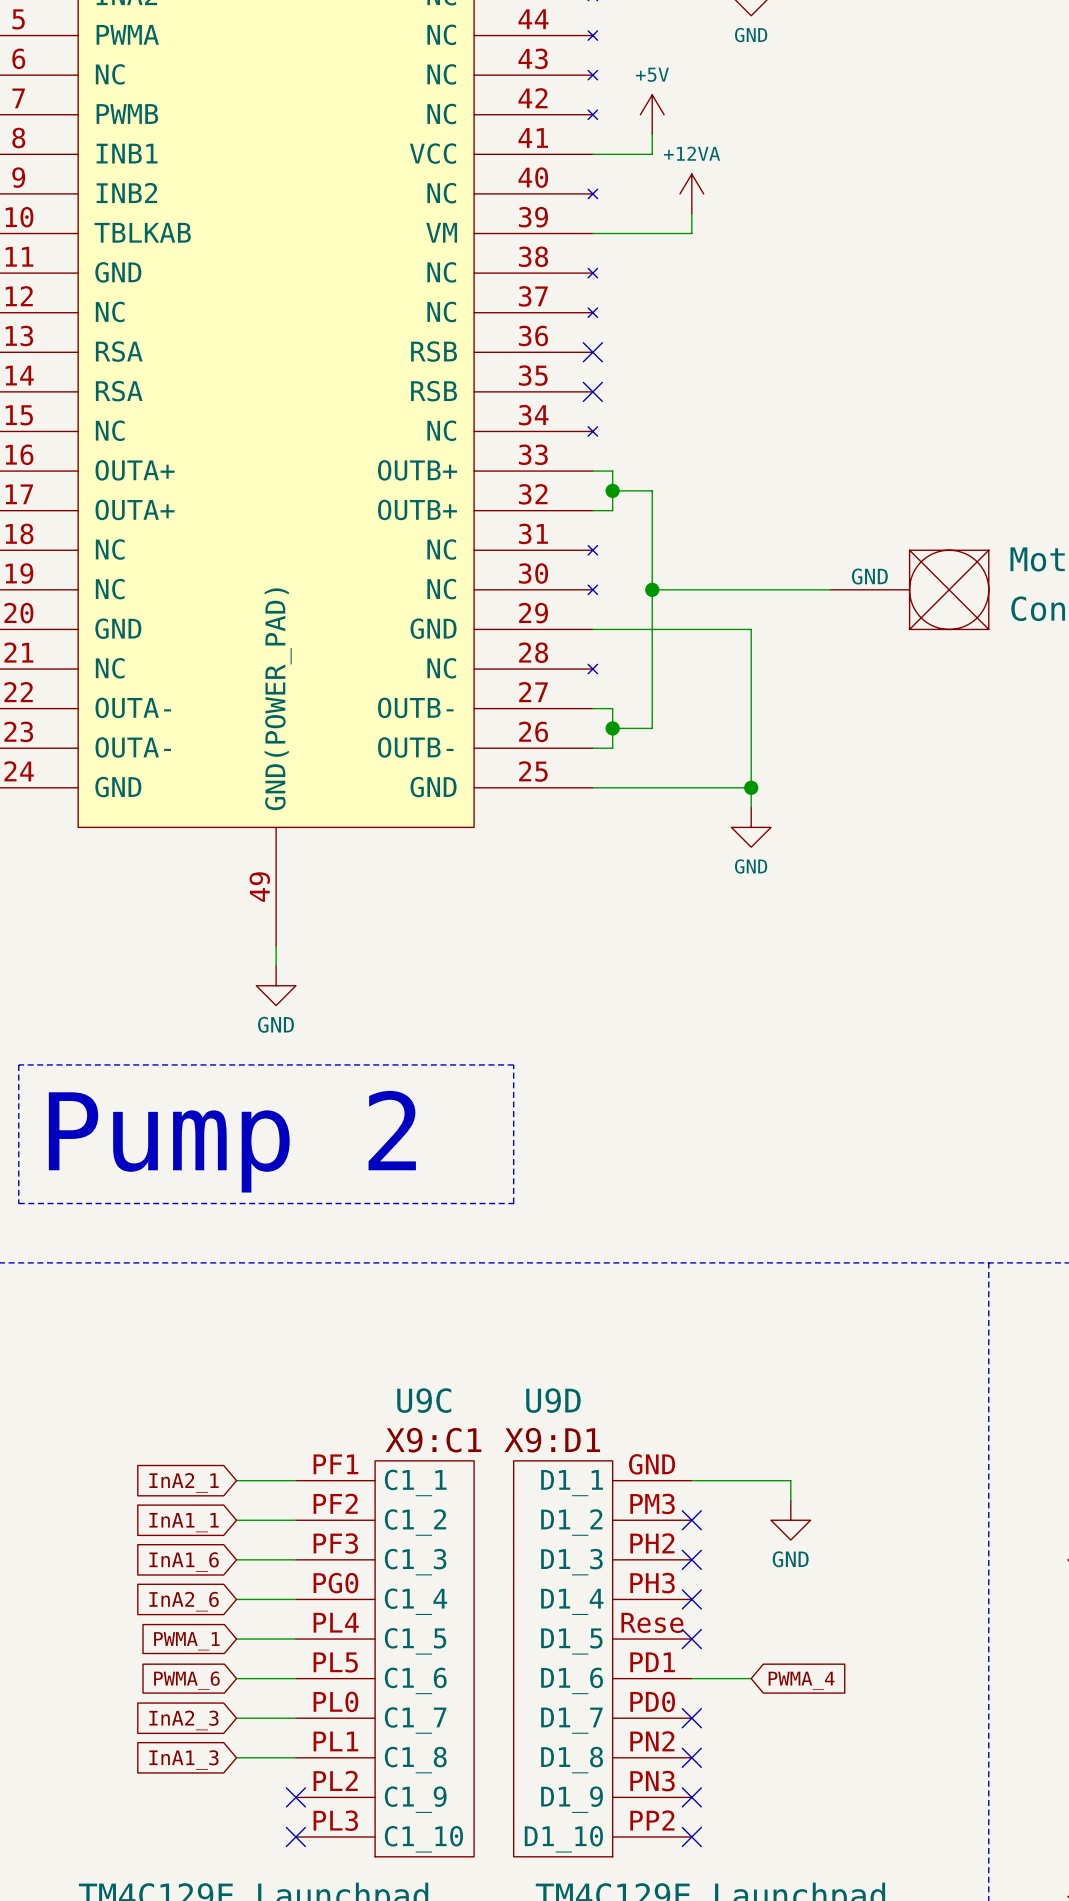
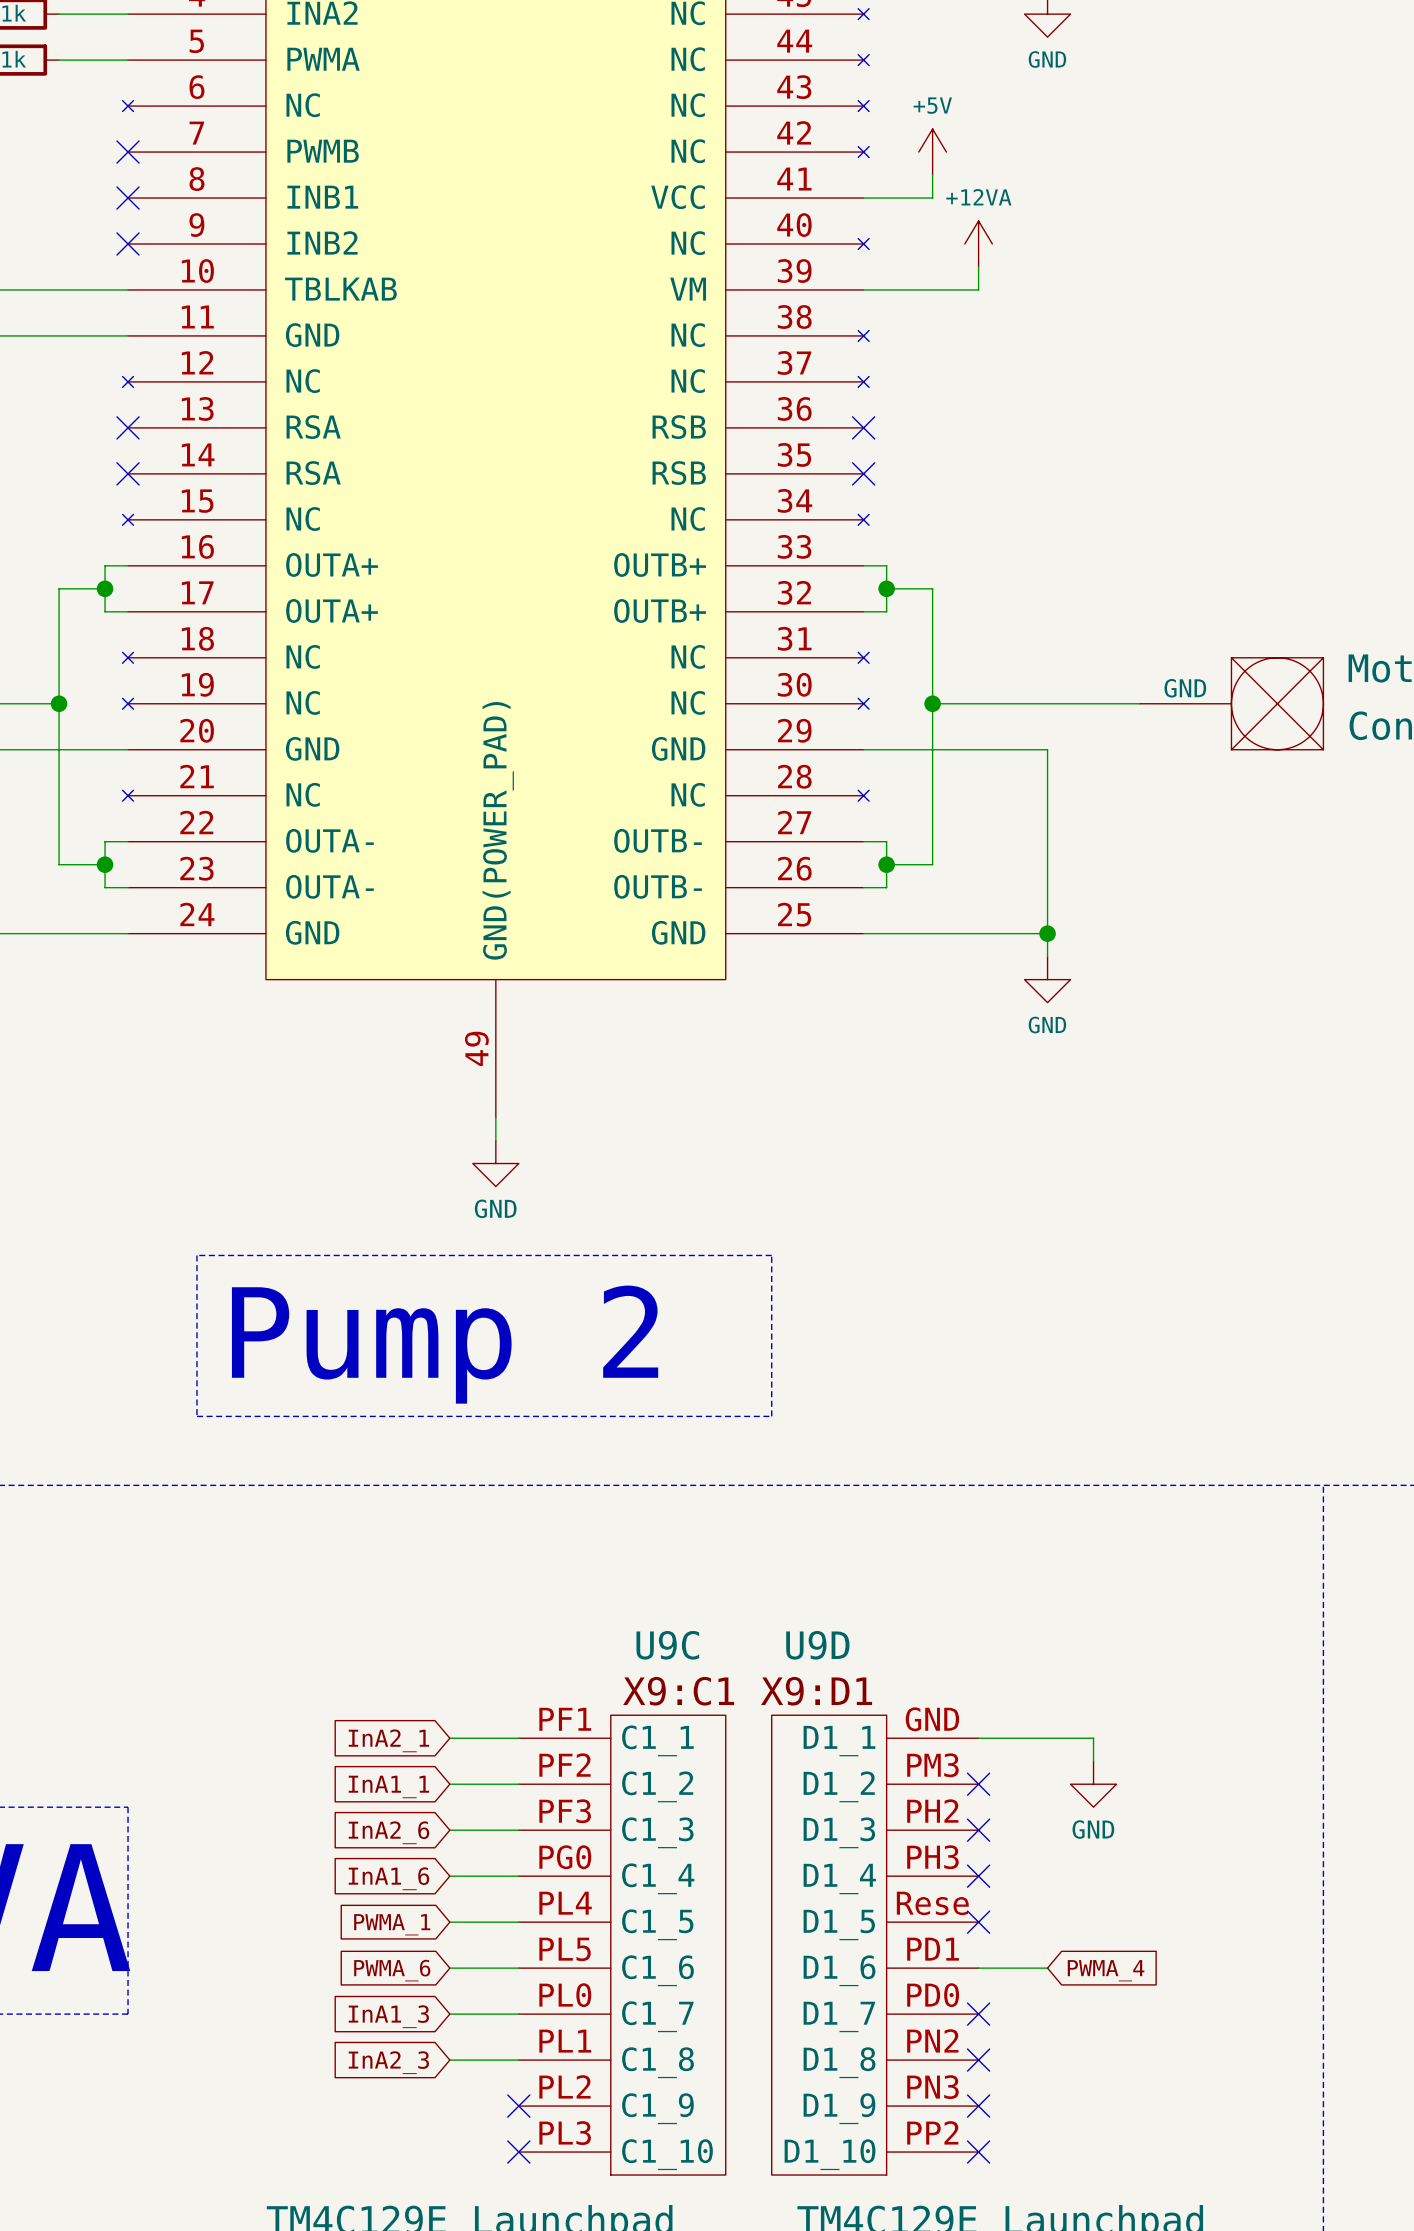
global label: InA1_6 (184, 1562) -> InA2_6 (388, 1832)
global label: InA2_6 (184, 1601) -> InA1_6 (388, 1878)
global label: InA2_3 (183, 1720) -> InA1_3 (388, 2016)
global label: InA1_3 (183, 1760) -> InA2_3 (388, 2062)

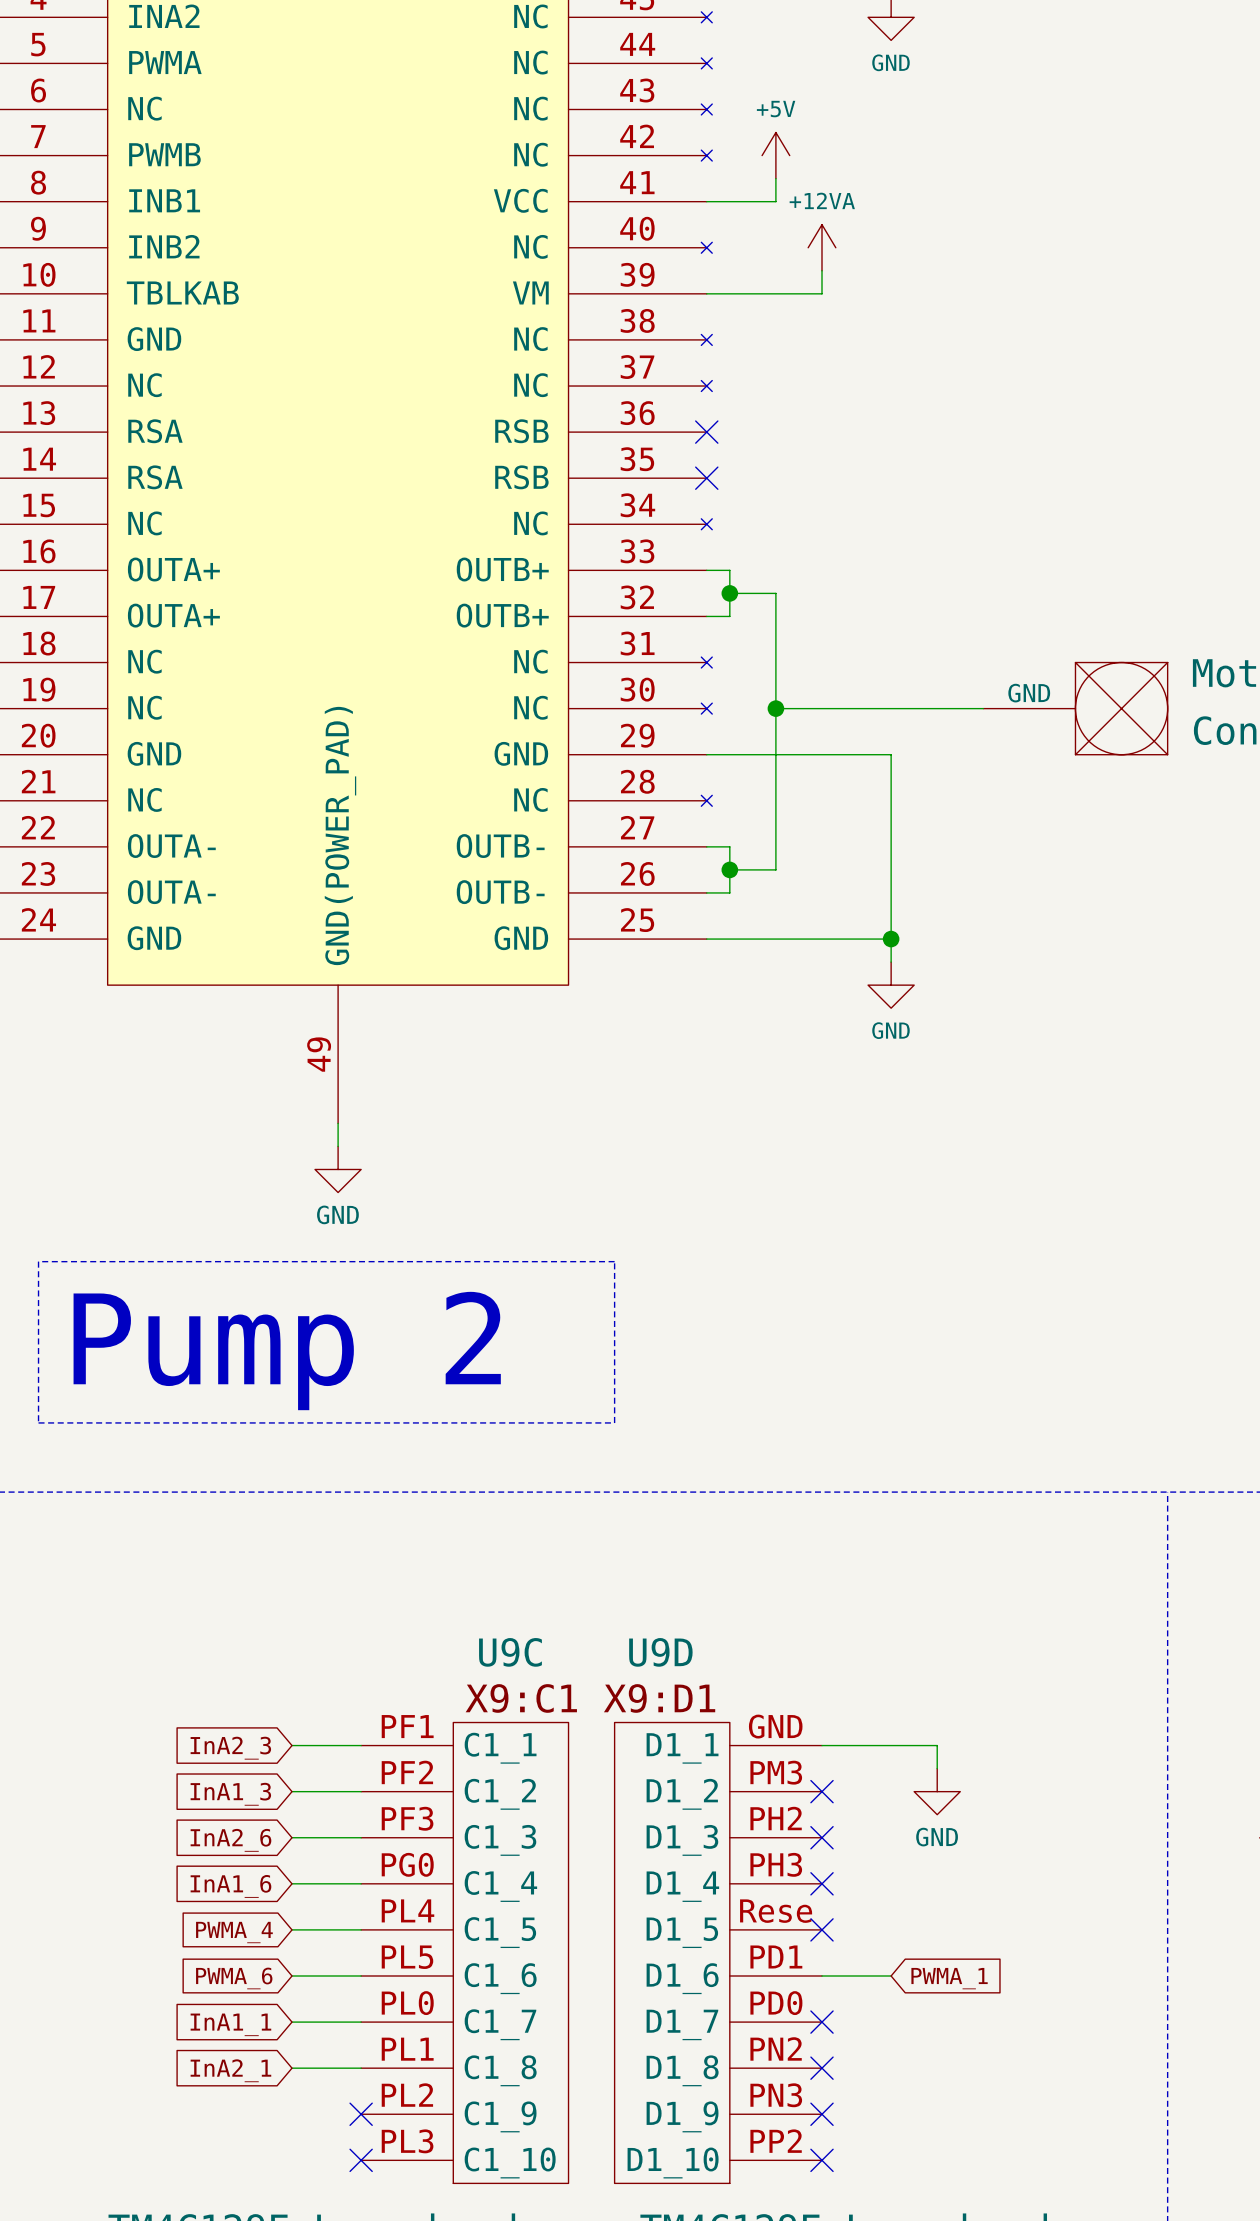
global label: InA2_1 (388, 1740) -> InA2_3 (230, 1748)
global label: InA1_1 (388, 1786) -> InA1_3 (230, 1794)
global label: PWMA_1 (392, 1924) -> PWMA_4 (234, 1932)
global label: PWMA_4 (1106, 1970) -> PWMA_1 (949, 1978)
global label: InA1_3 (388, 2016) -> InA1_1 (230, 2024)
global label: InA2_3 (388, 2062) -> InA2_1 (230, 2070)

